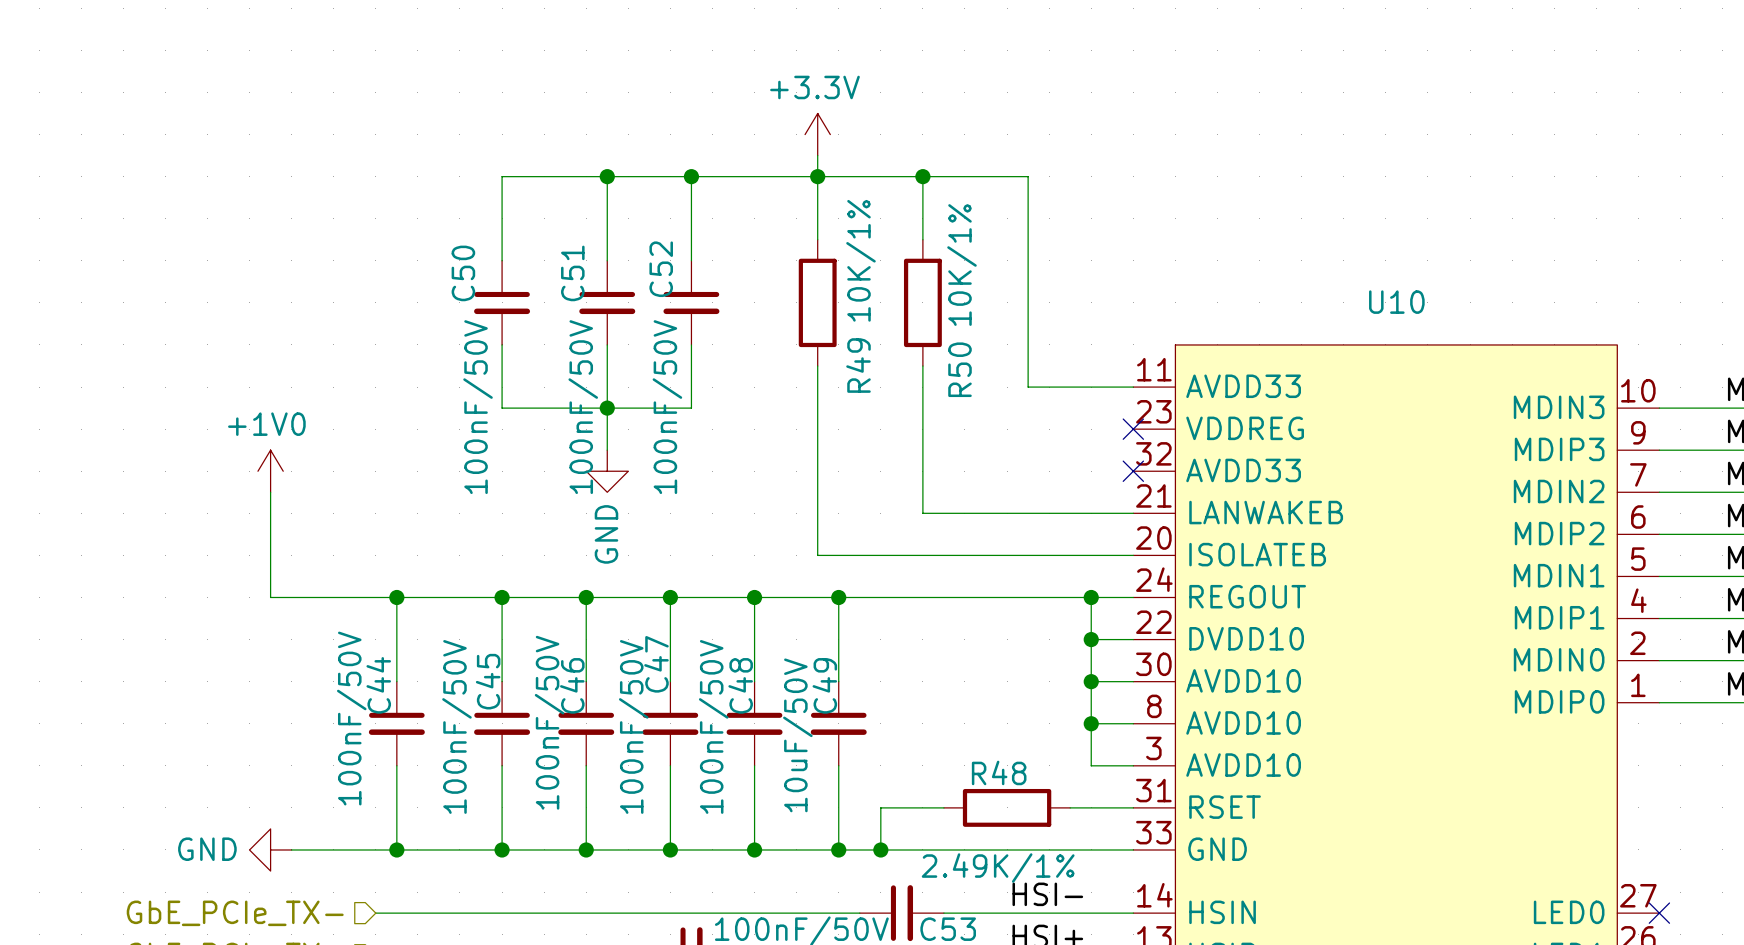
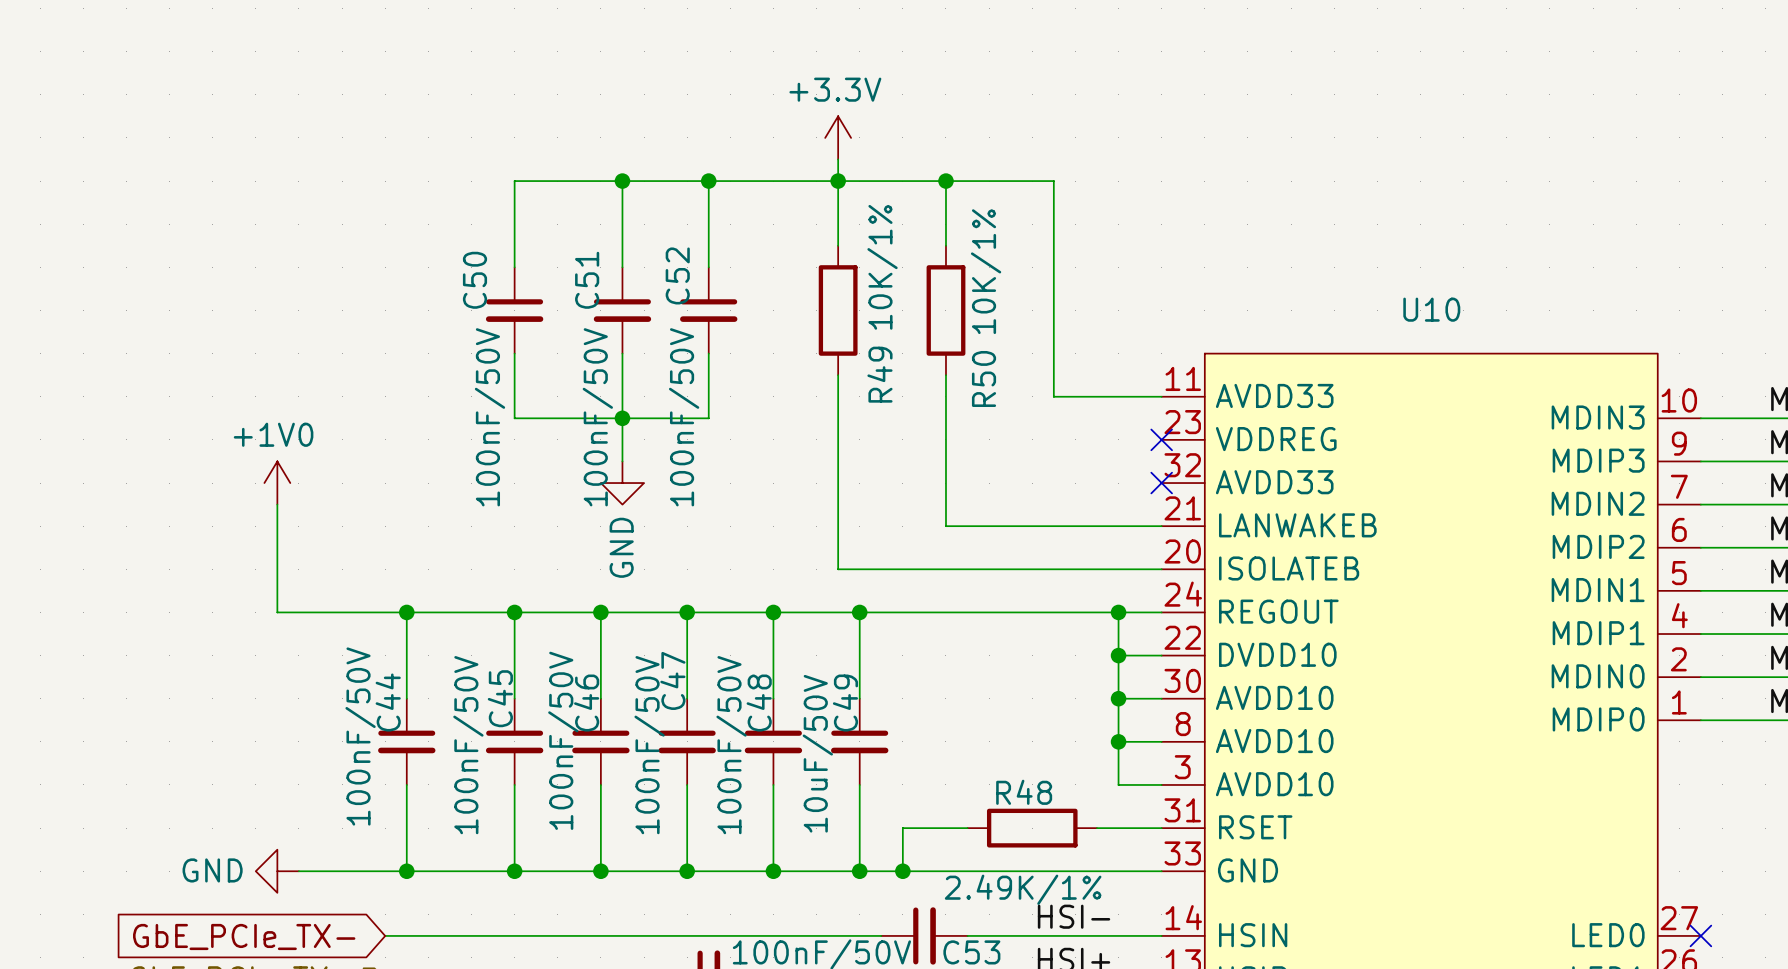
hierarchical label: GbE_PCIe_TX- (235, 913) -> none
global label: none -> GbE_PCIe_TX- (244, 936)

